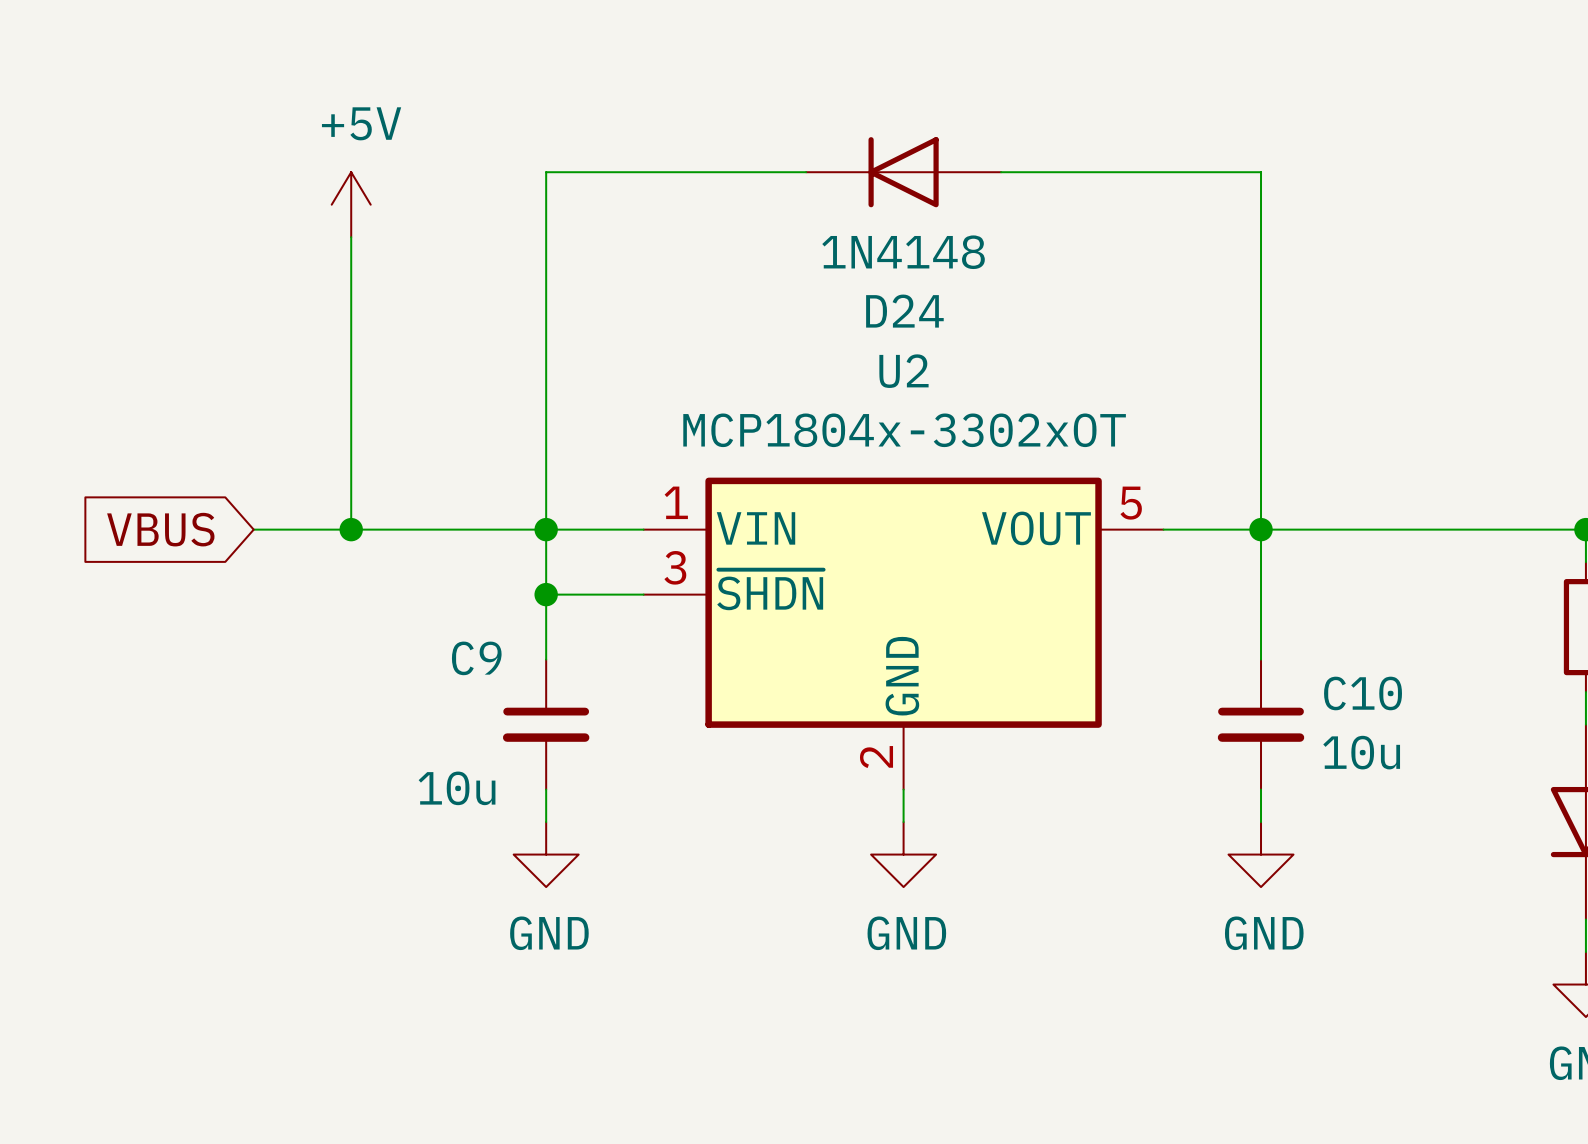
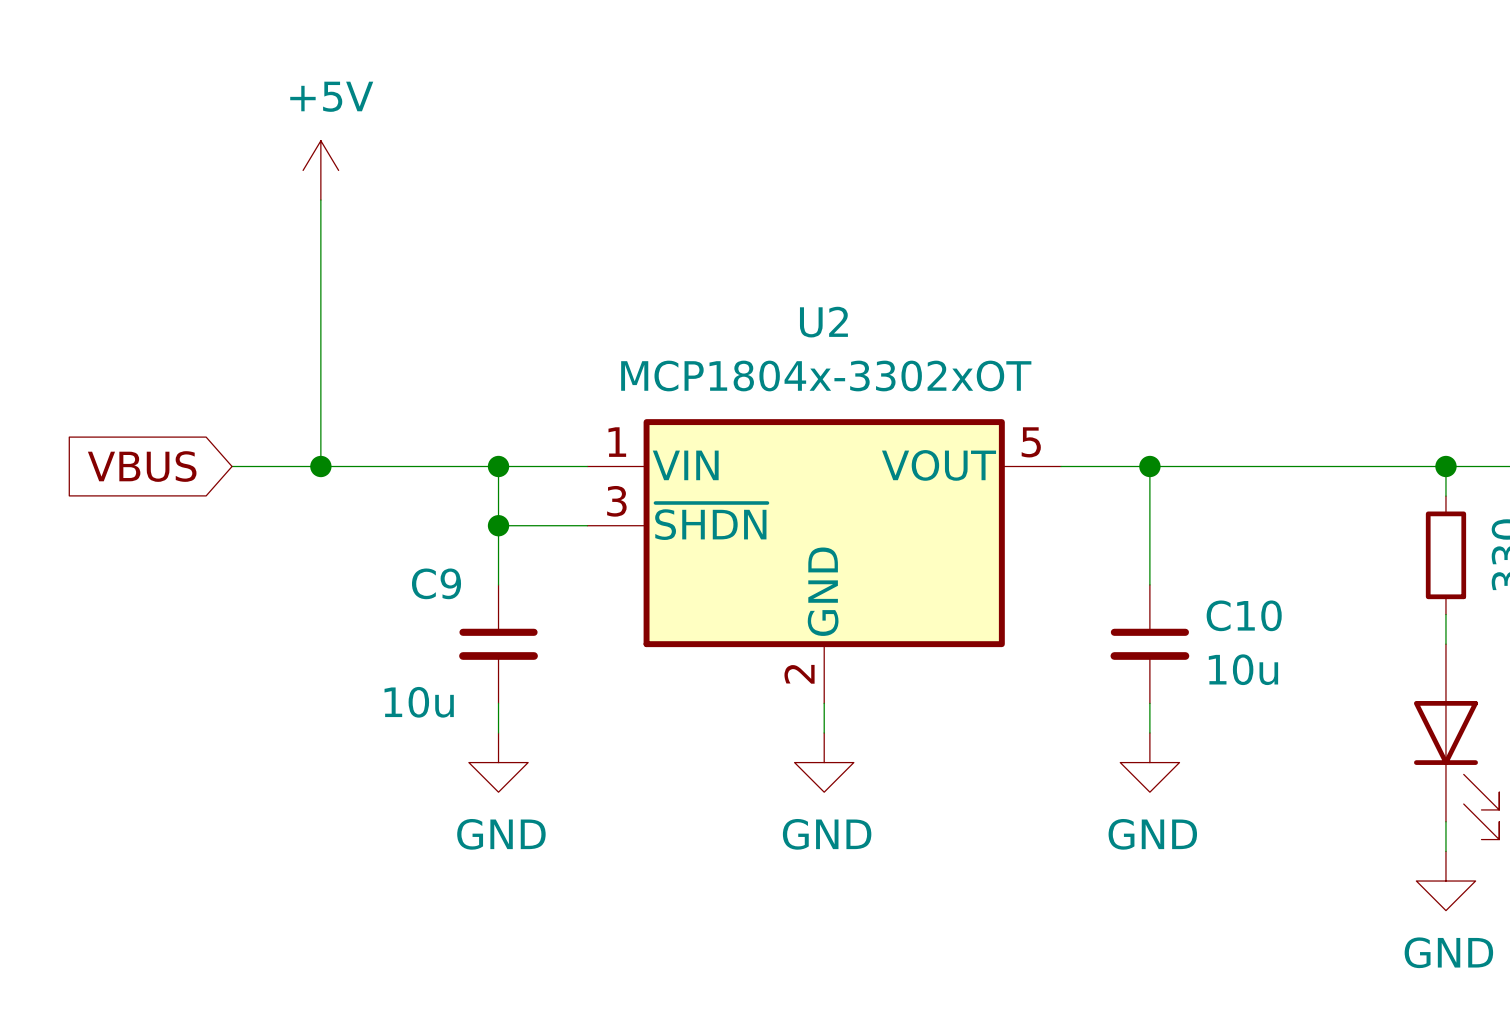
wire: (806, 172) (546, 172) (546, 529) -> none
D24: 1N4148 (903, 172) -> none
wire: (1001, 172) (1261, 172) (1261, 529) -> none

